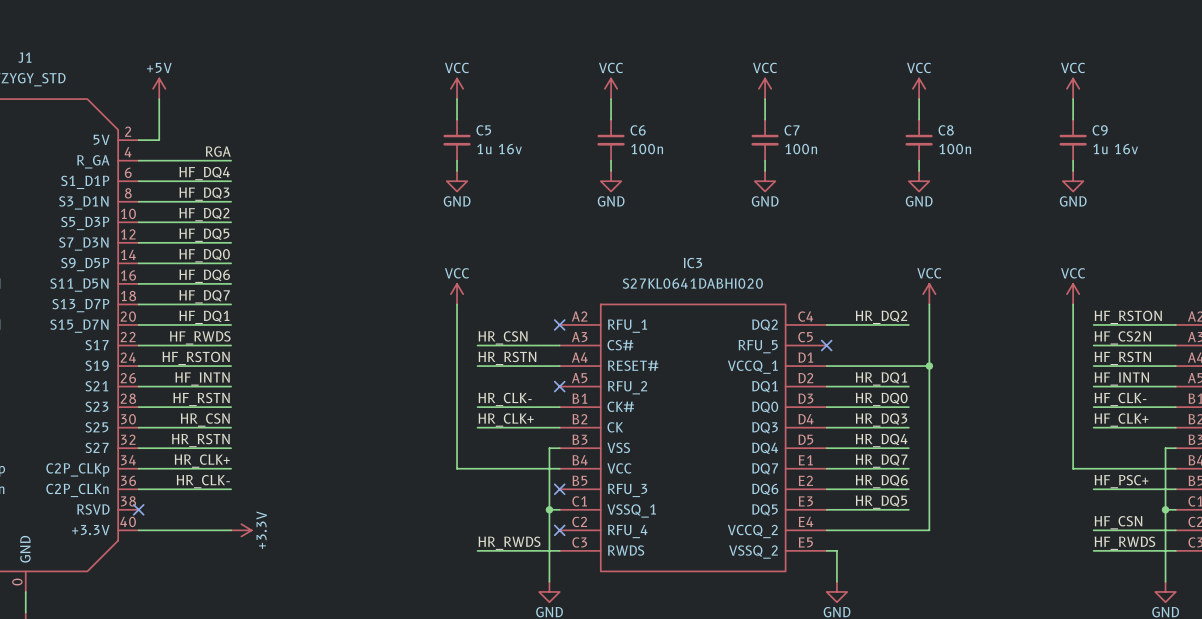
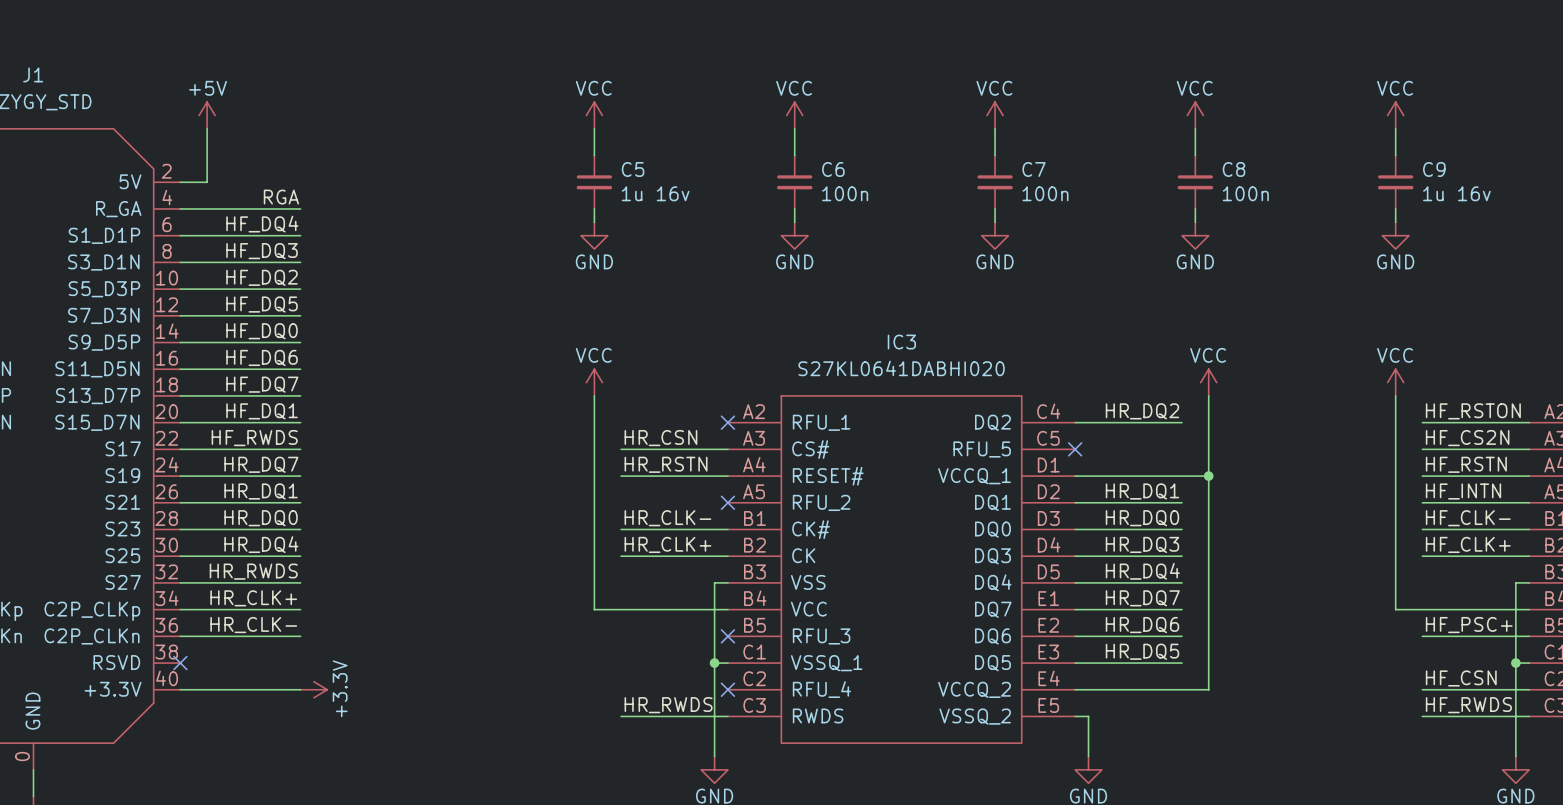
label: HF_RSTON (196, 358) -> HR_DQ7 (261, 464)
label: HF_INTN (202, 378) -> HR_DQ1 (261, 491)
label: HF_RSTN (201, 399) -> HR_DQ0 (261, 518)
label: HR_CSN (205, 420) -> HR_DQ4 (261, 544)
label: HR_RSTN (200, 440) -> HR_RWDS (253, 571)

